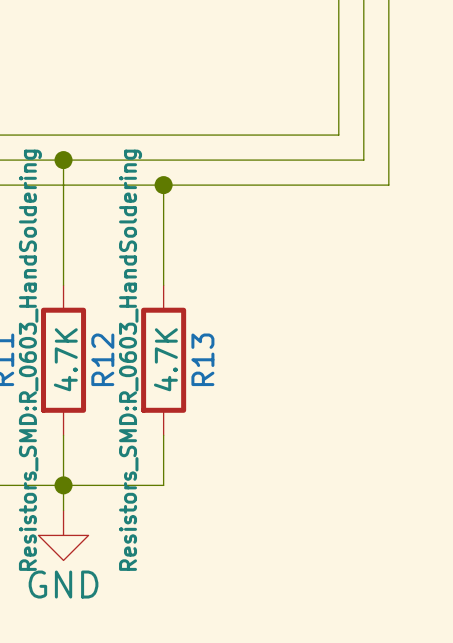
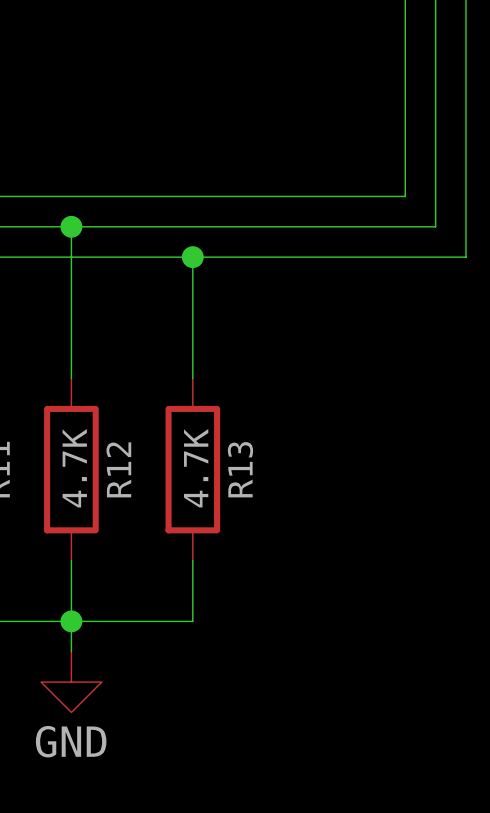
R12 text: Resistors_SMD:R_0603_HandSoldering (30, 360) -> none
R13 text: Resistors_SMD:R_0603_HandSoldering (130, 360) -> none

